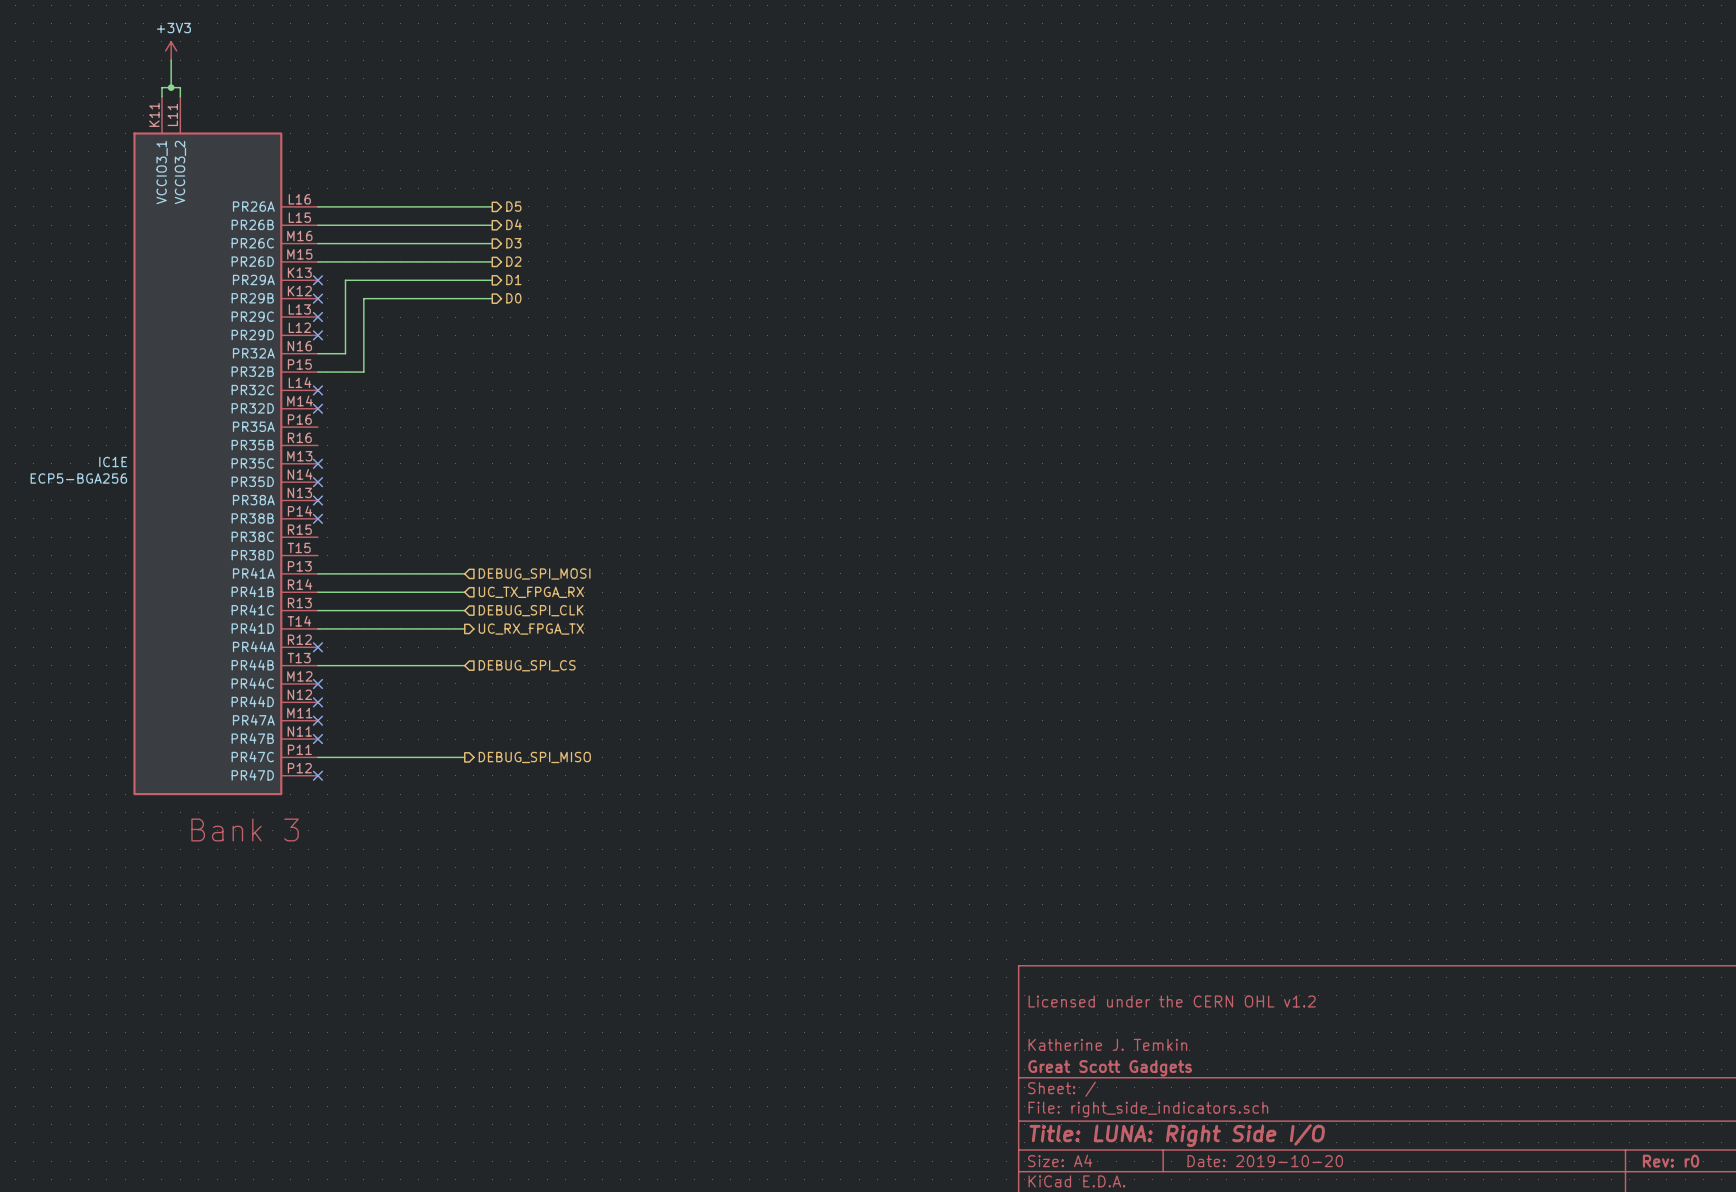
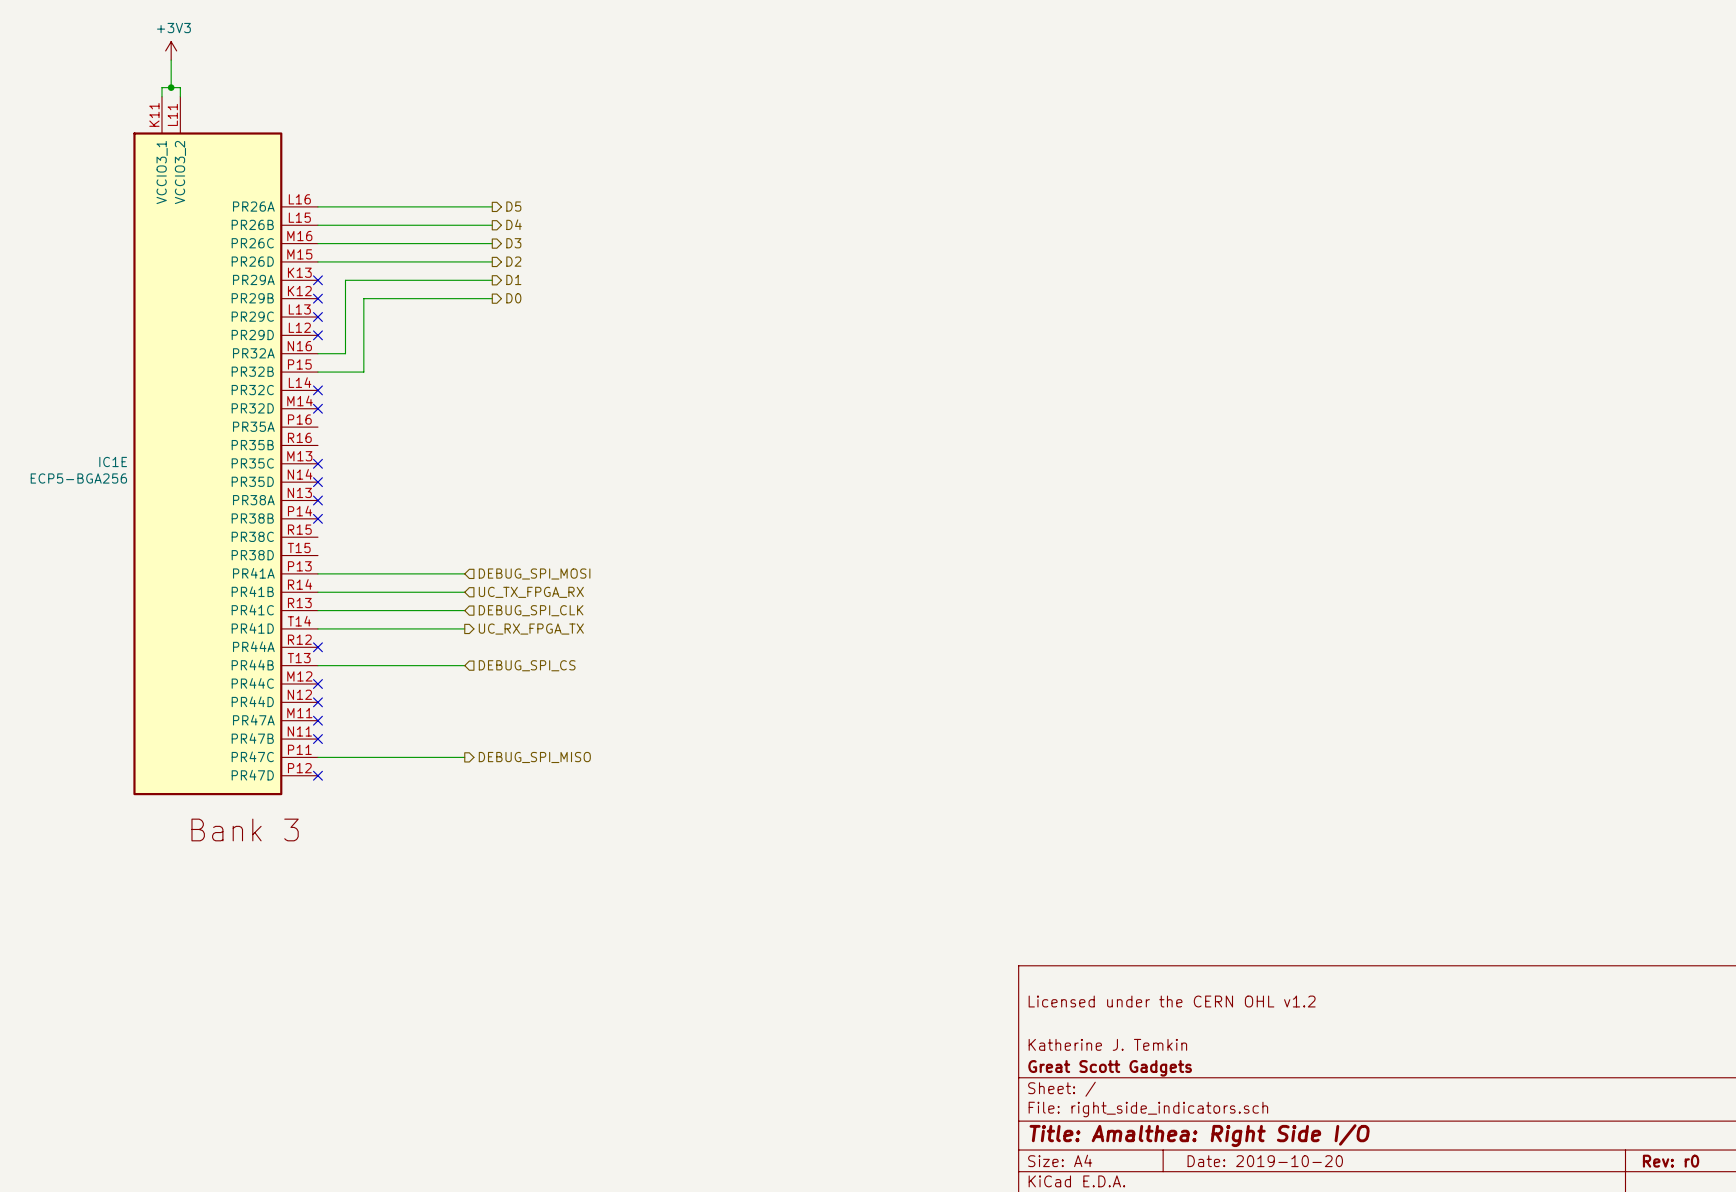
title block: Title: LUNA: Right Side I/O (1177, 1135) -> Title: Amalthea: Right Side I/O (1199, 1135)

